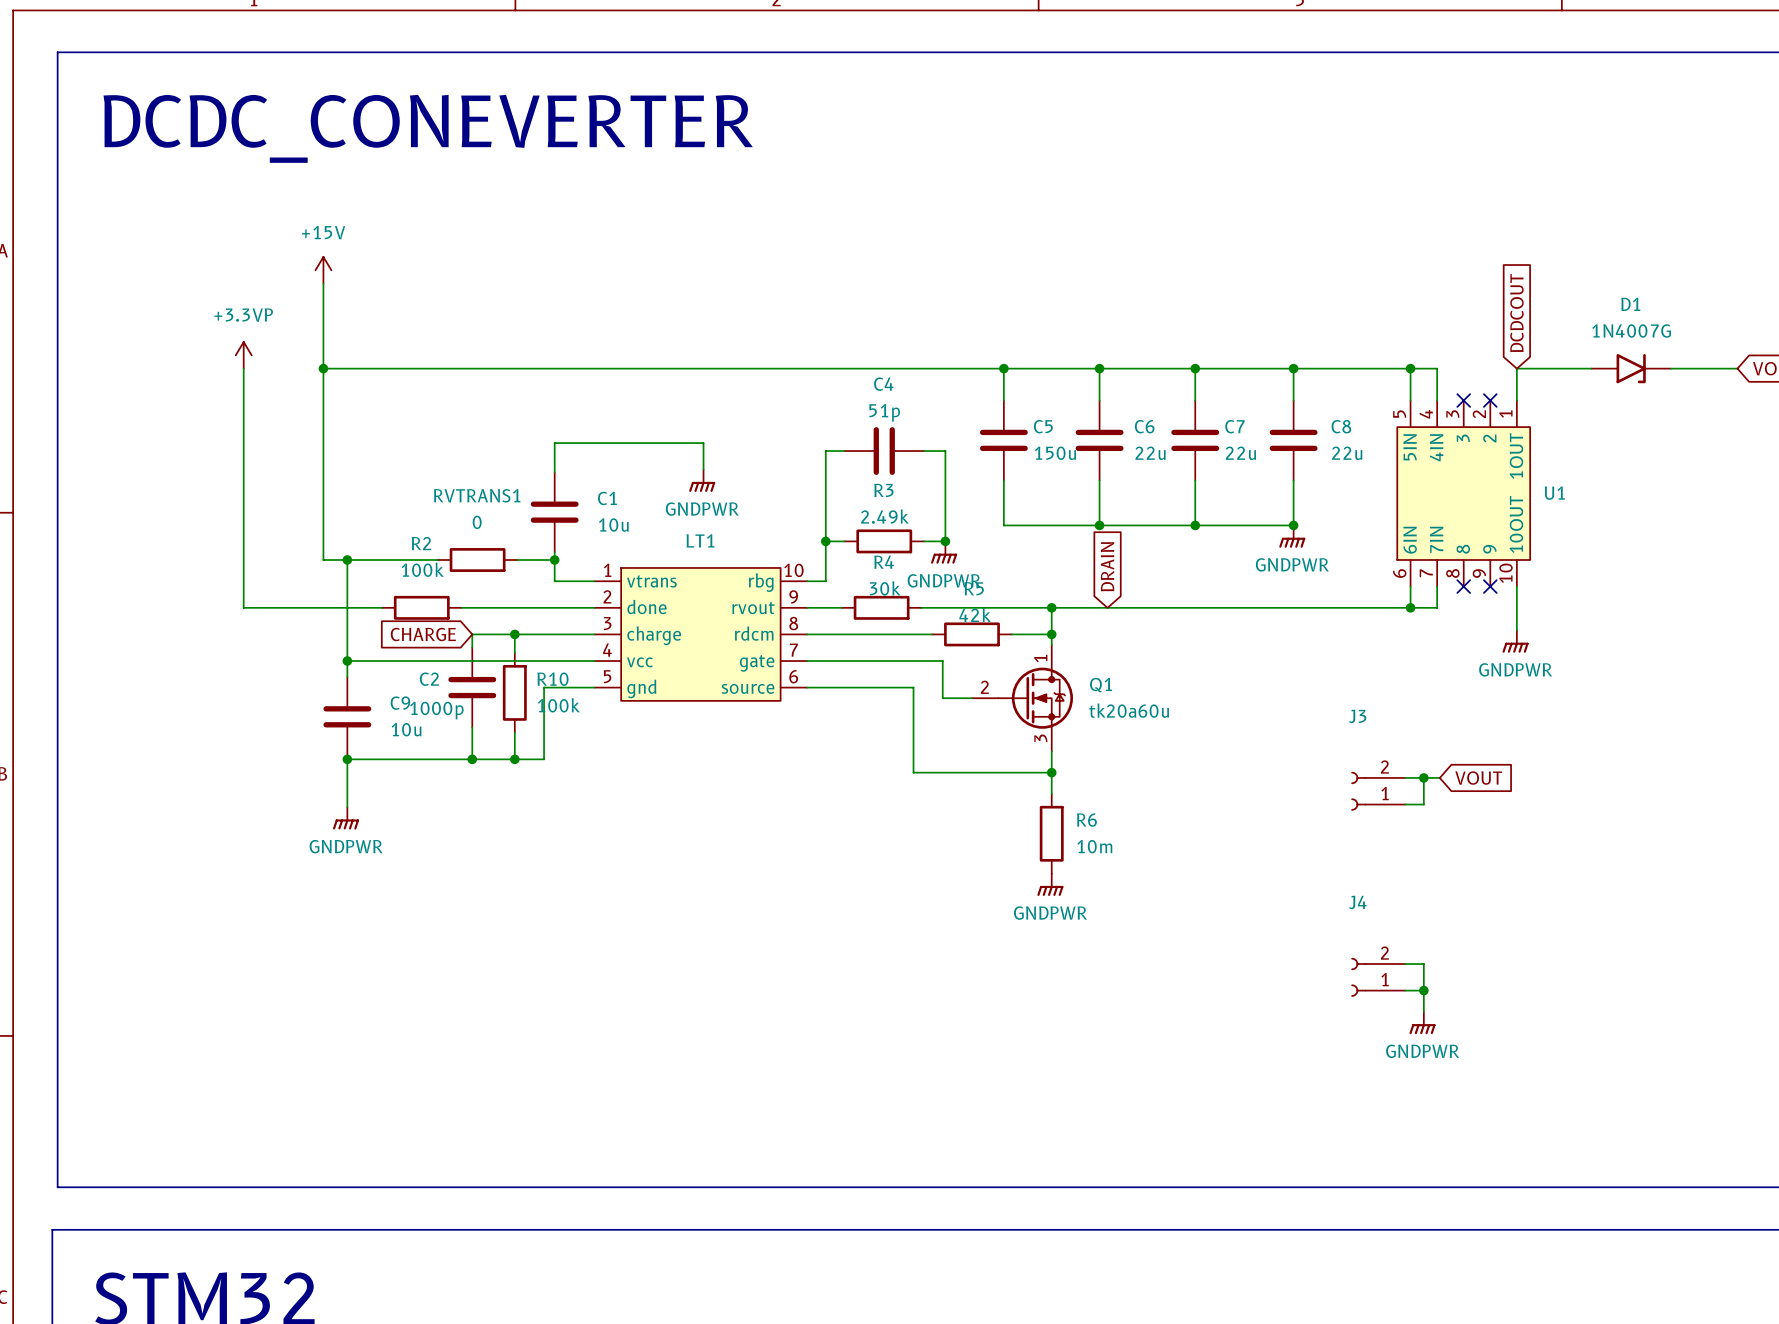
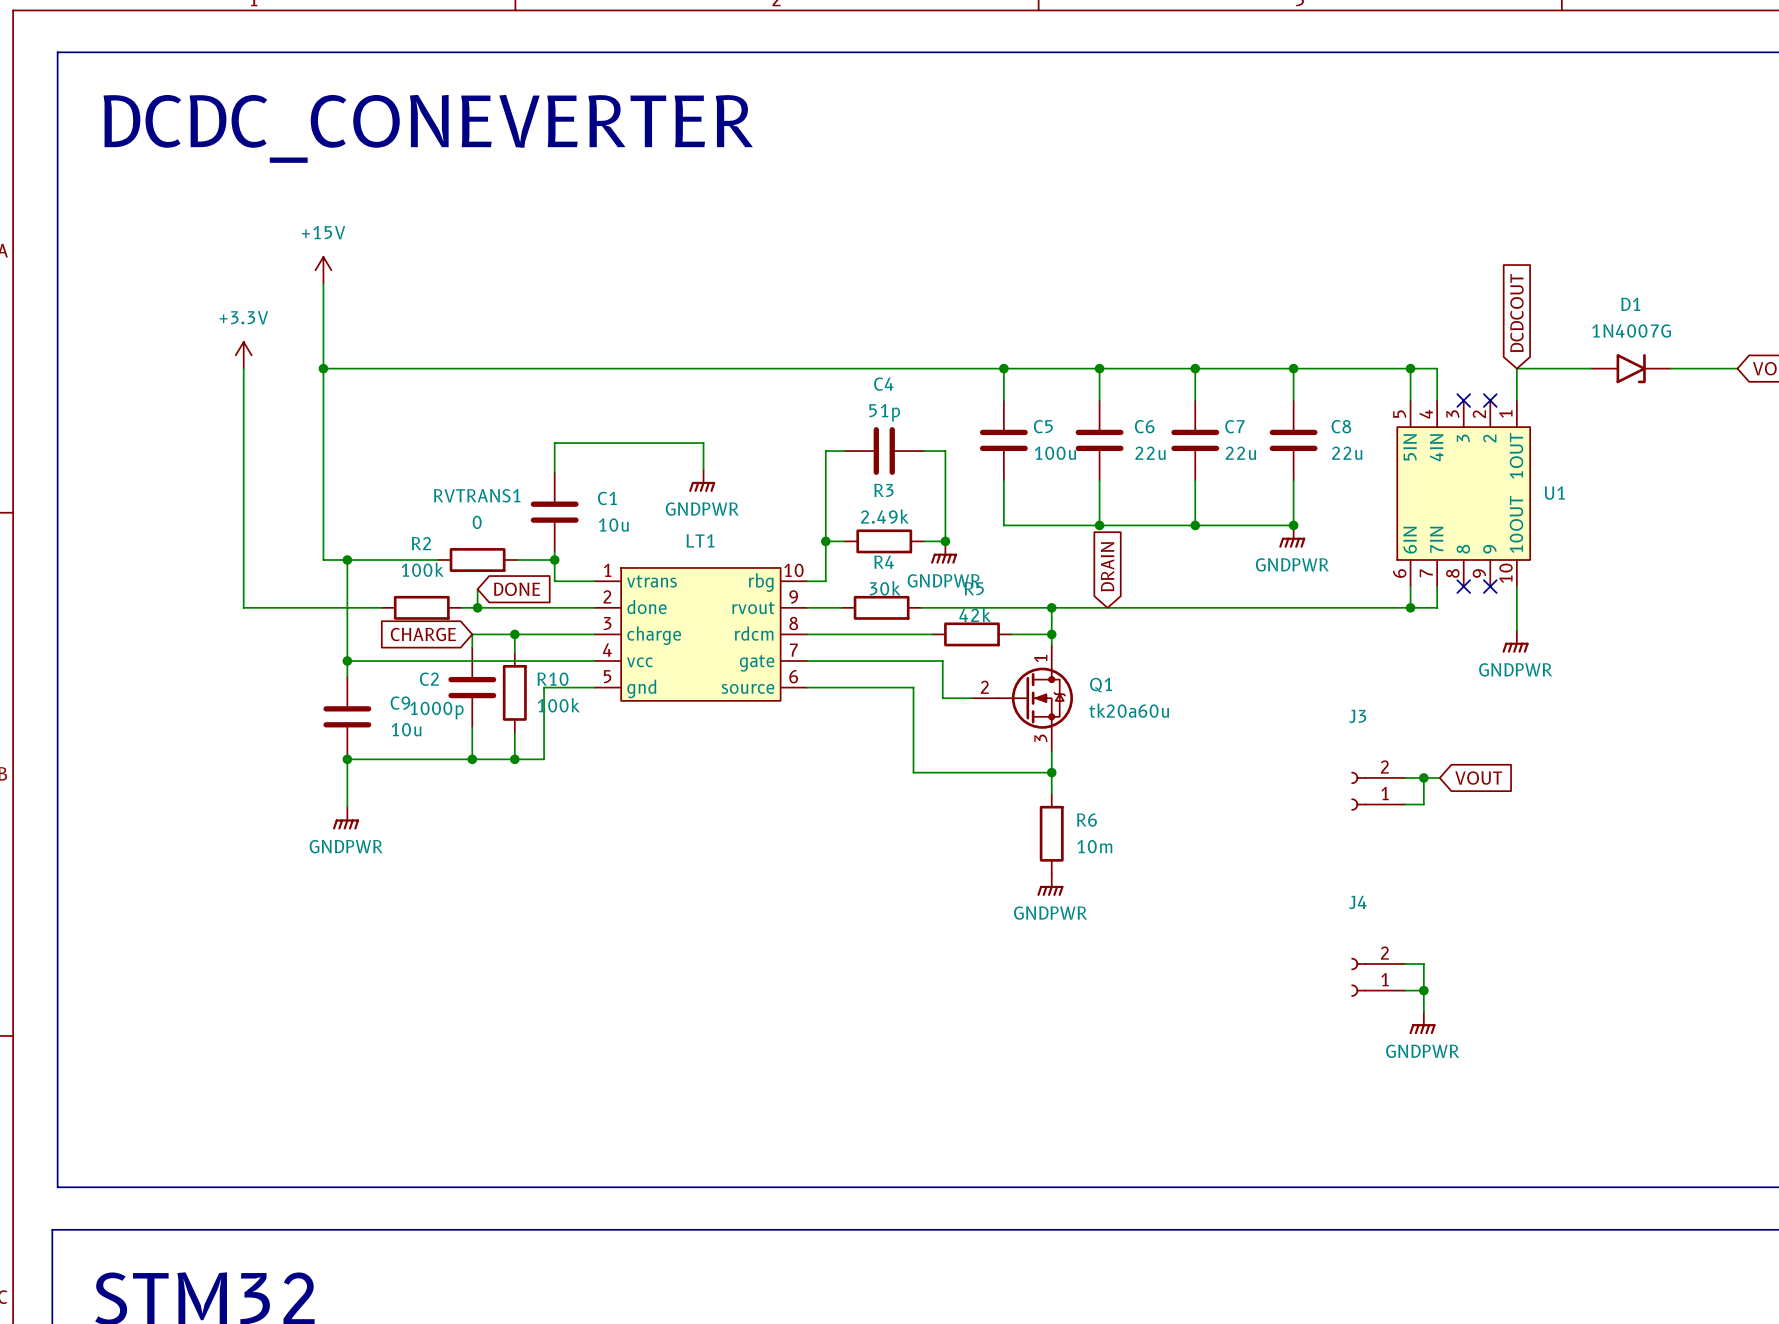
power symbol: +3.3VP (243, 355) -> +3.3V (243, 355)
C5 value: 150u (1055, 453) -> 100u (1055, 453)
wire: none -> (477, 589) (477, 607)
global label: none -> DONE (517, 589)
junction: none -> (477, 607)

